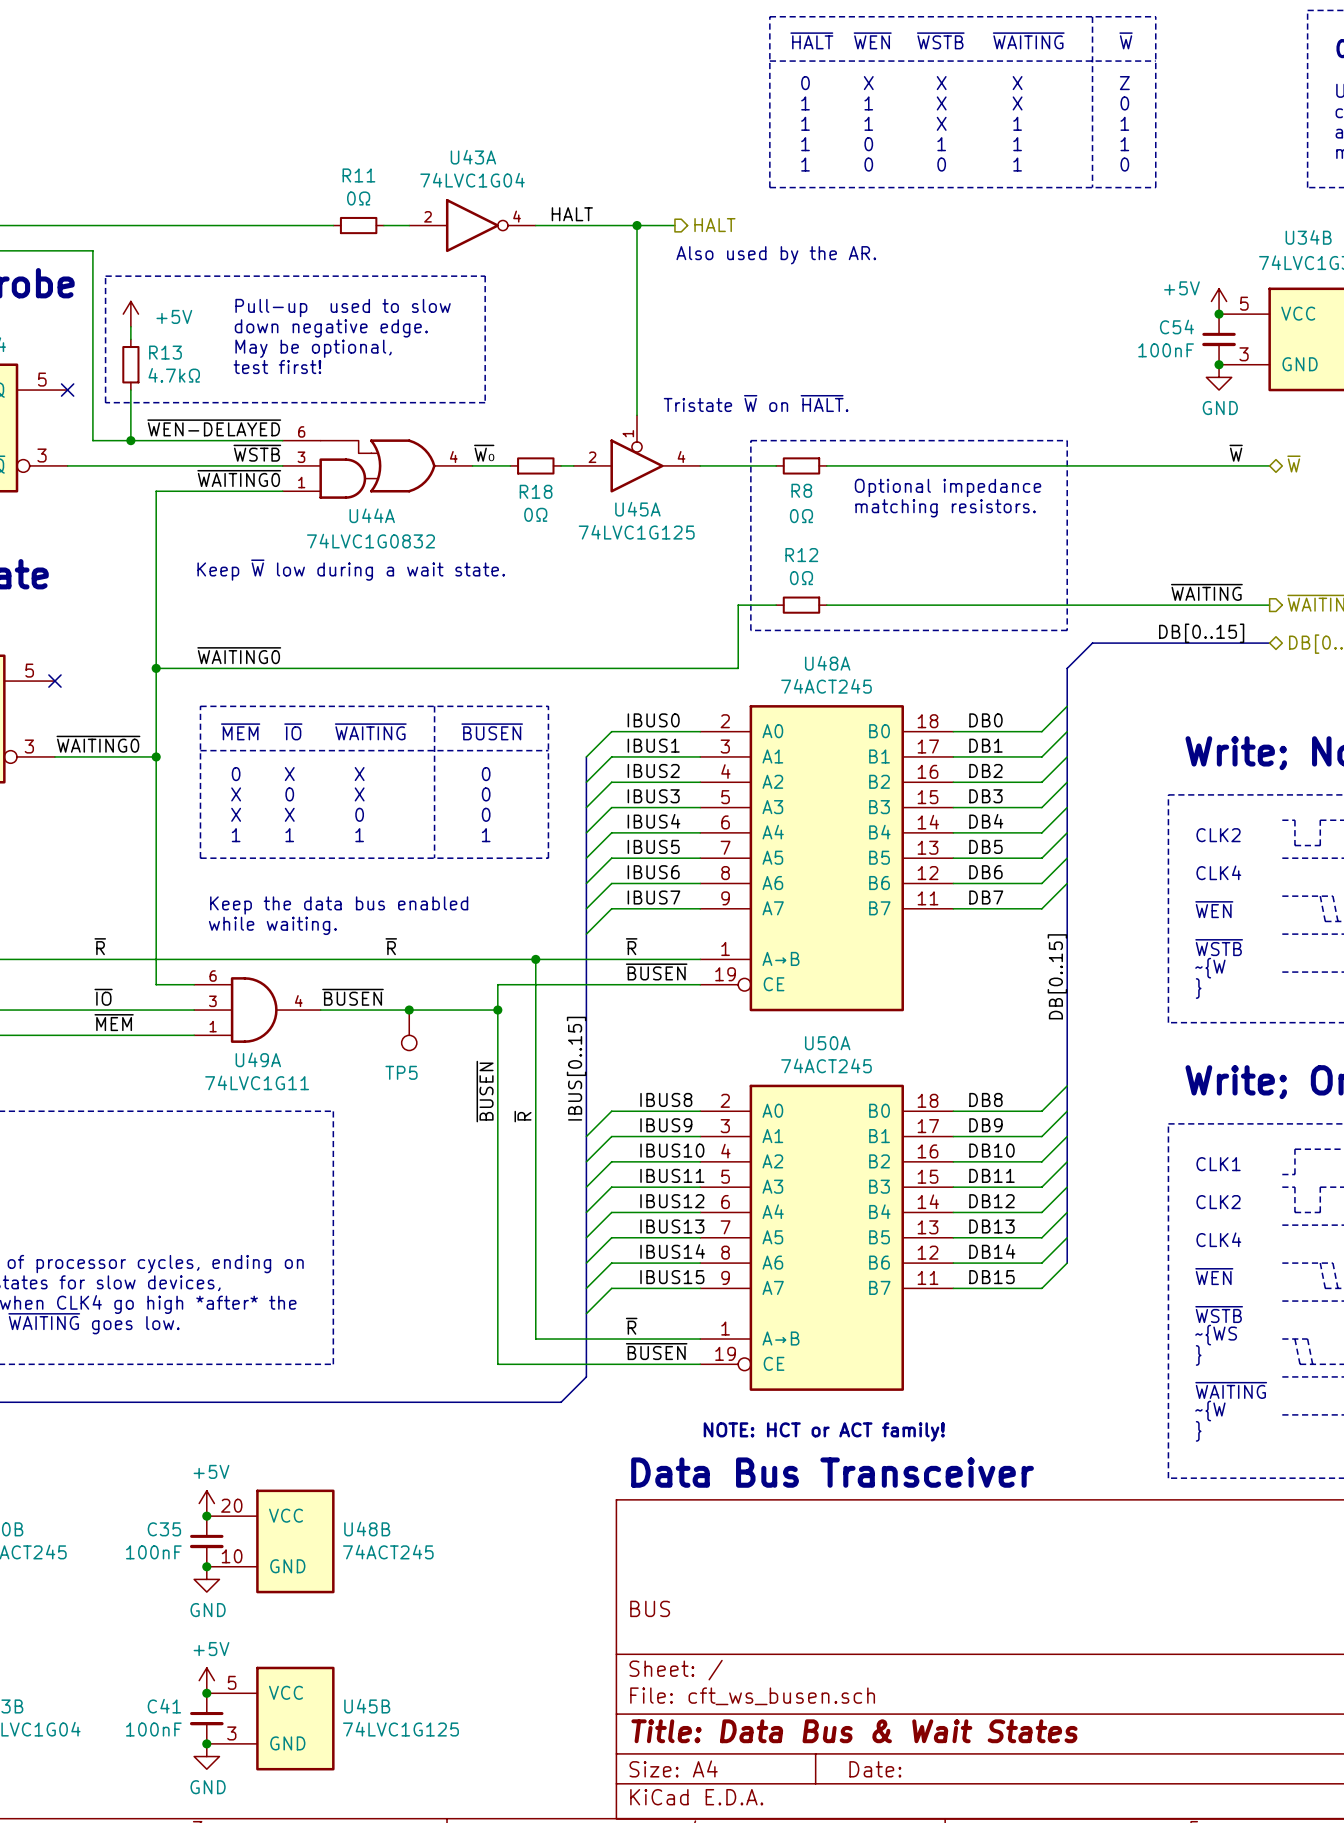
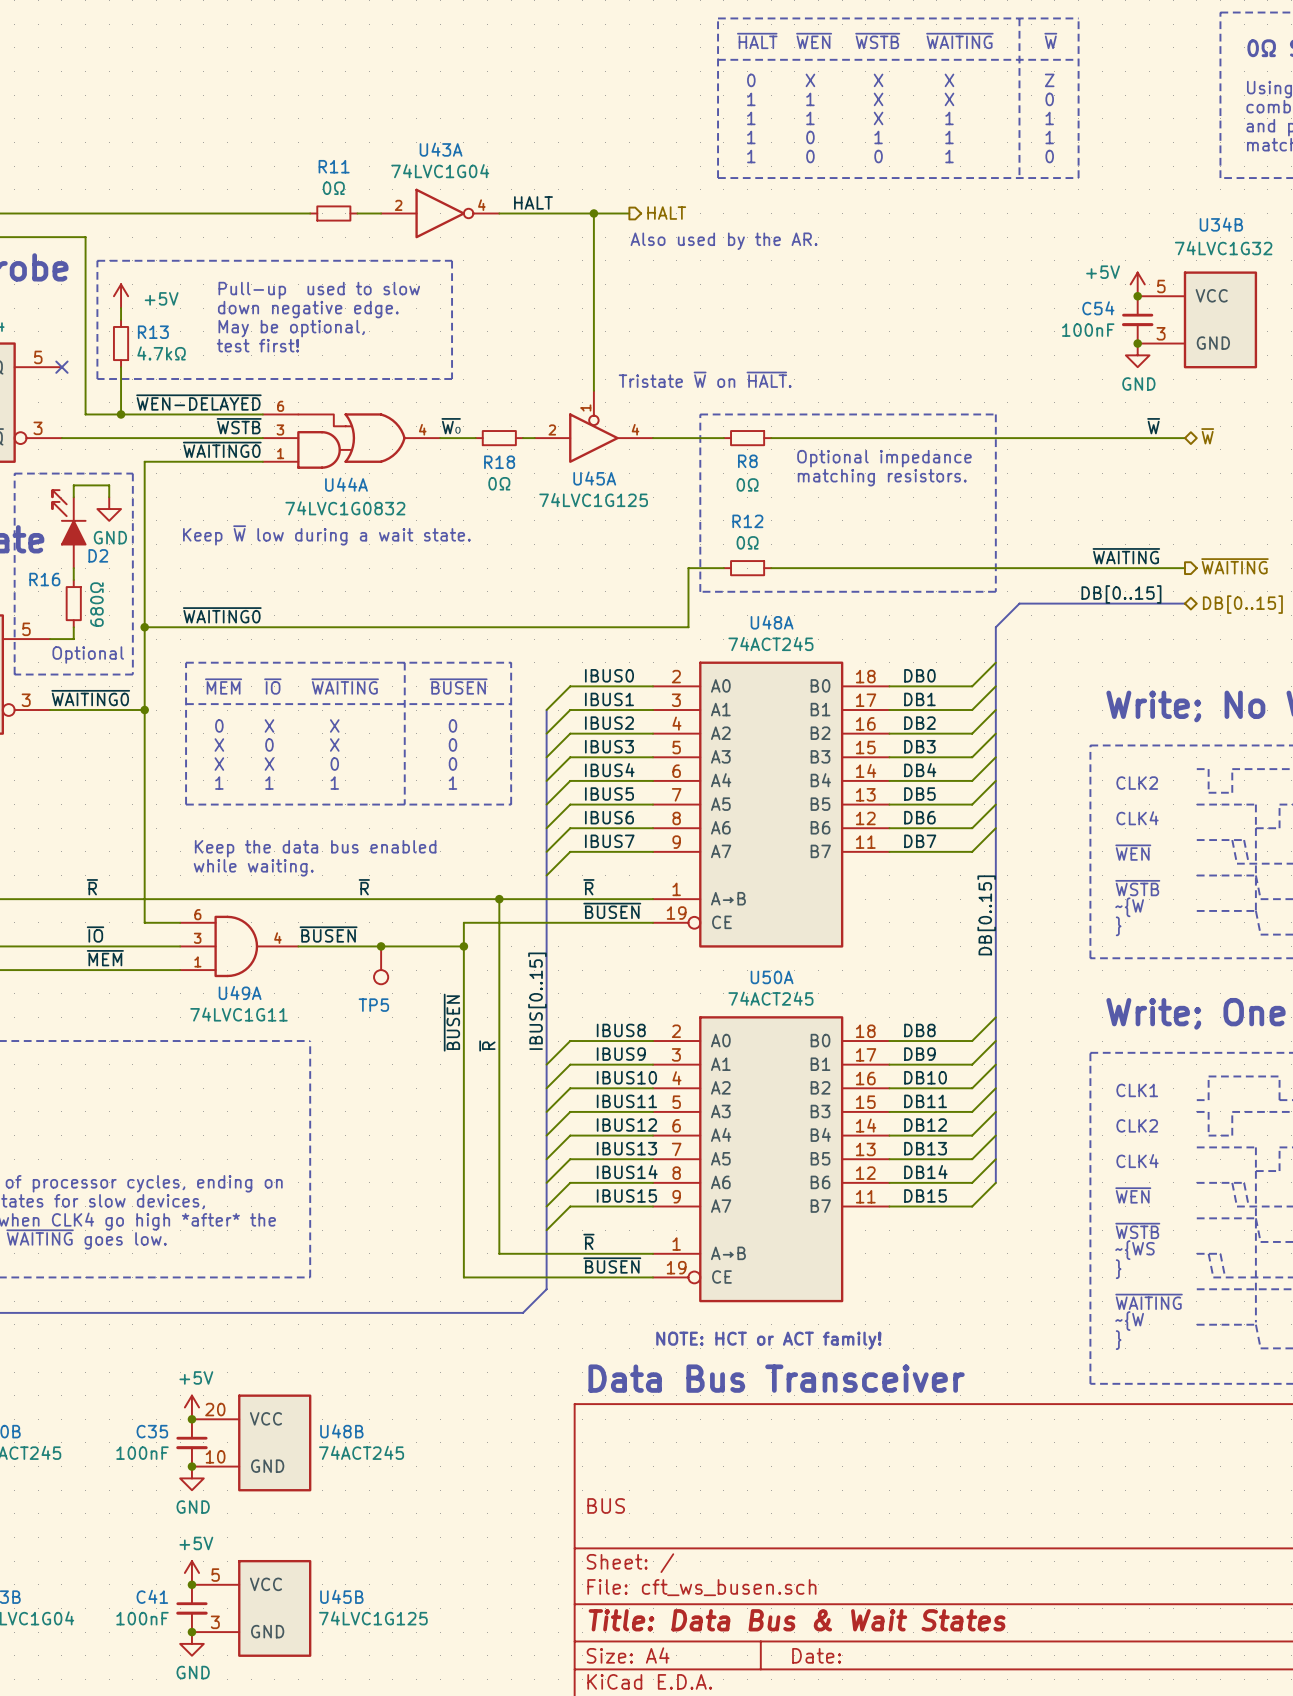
line: none -> (14, 473) (132, 473) (132, 674) (14, 674) (14, 473)
wire: none -> (73, 497) (73, 485) (109, 485) (109, 497)
power symbol: none -> GND (109, 509)
D2: none -> (69, 529)
wire: none -> (73, 568) (73, 579)
R16: none -> 680Ω (73, 603)
wire: none -> (73, 627) (73, 639) (50, 639)
no-connect mark: (54, 681) -> none
text: none -> Optional (88, 655)

